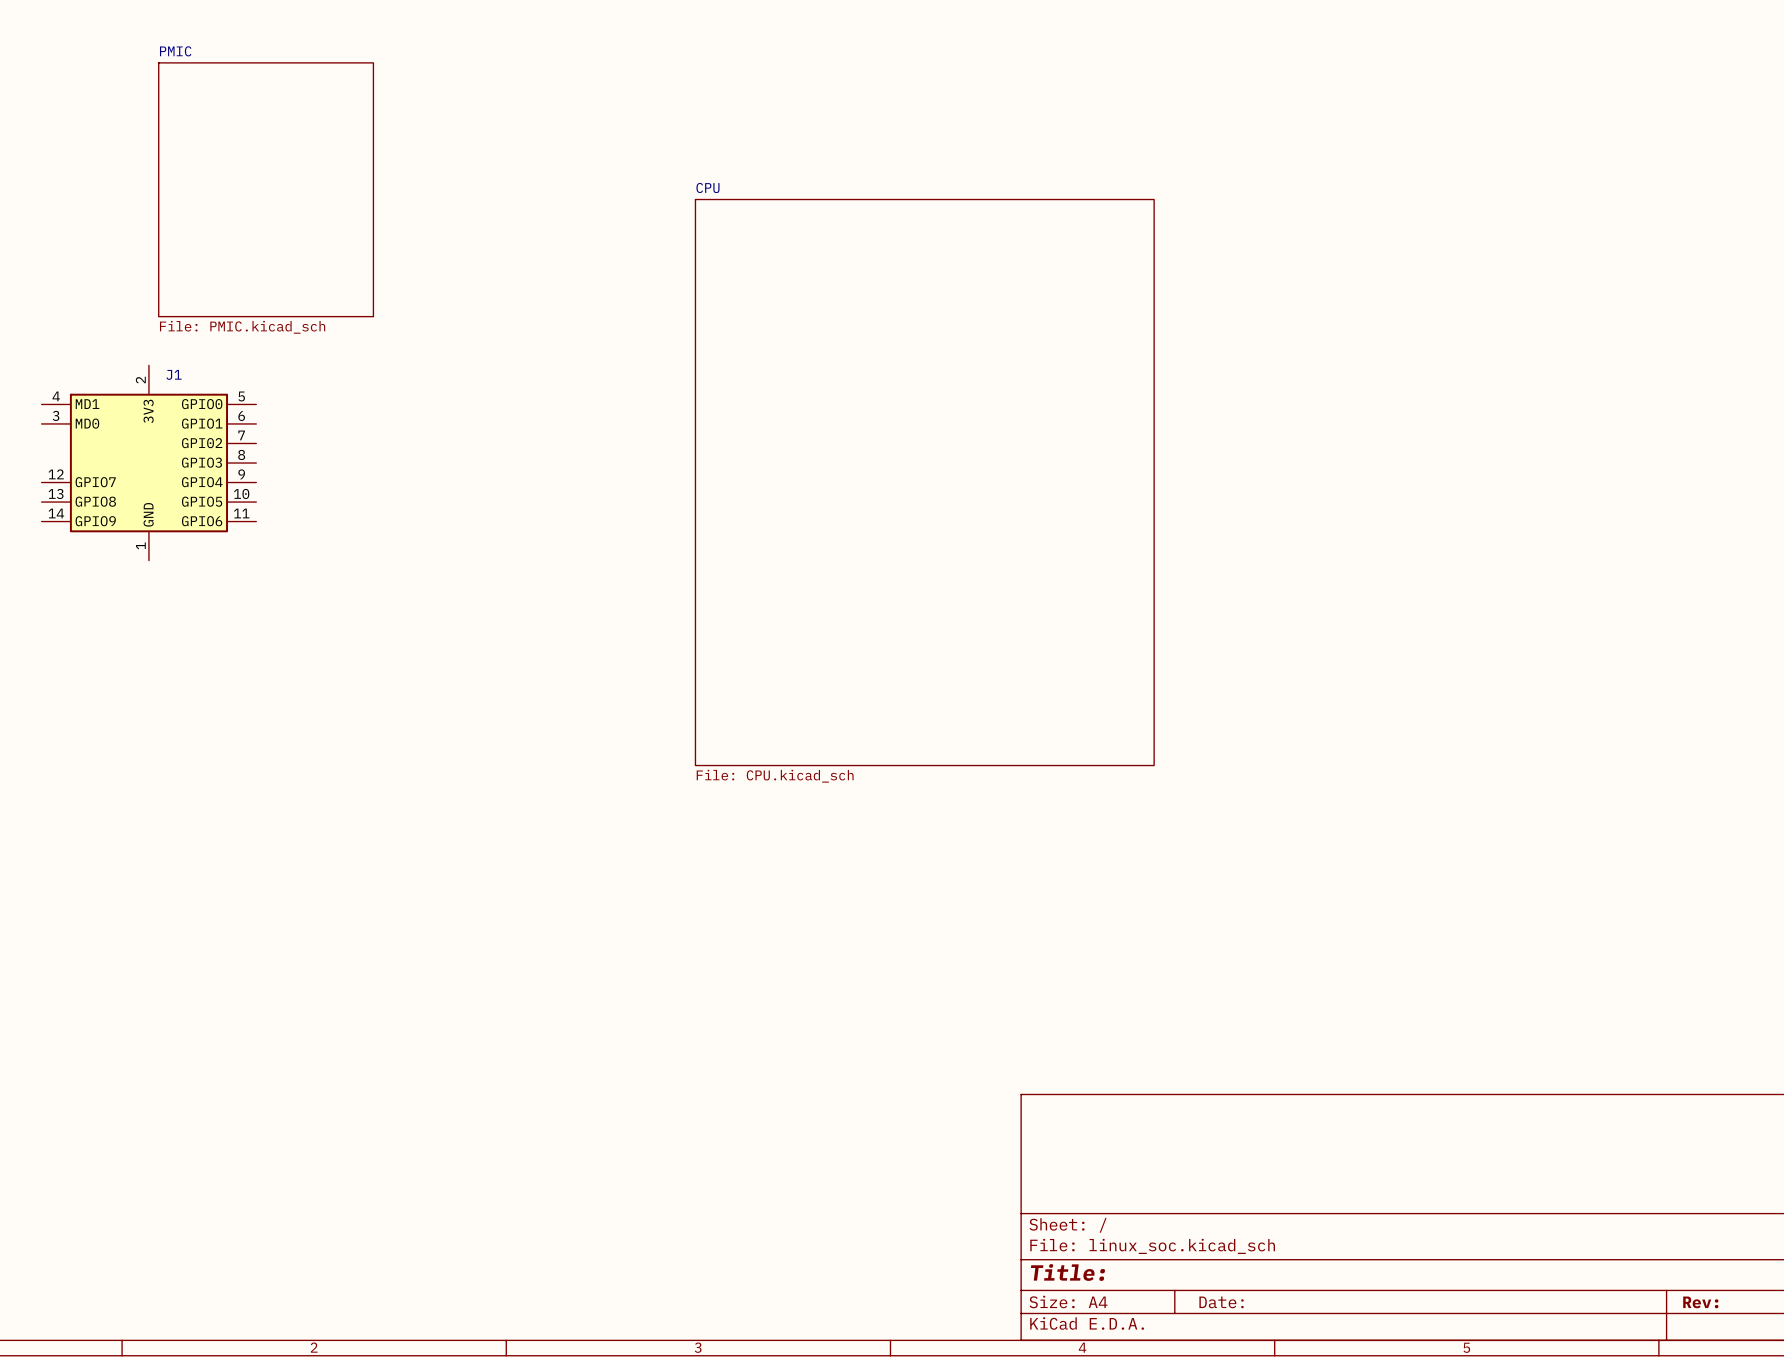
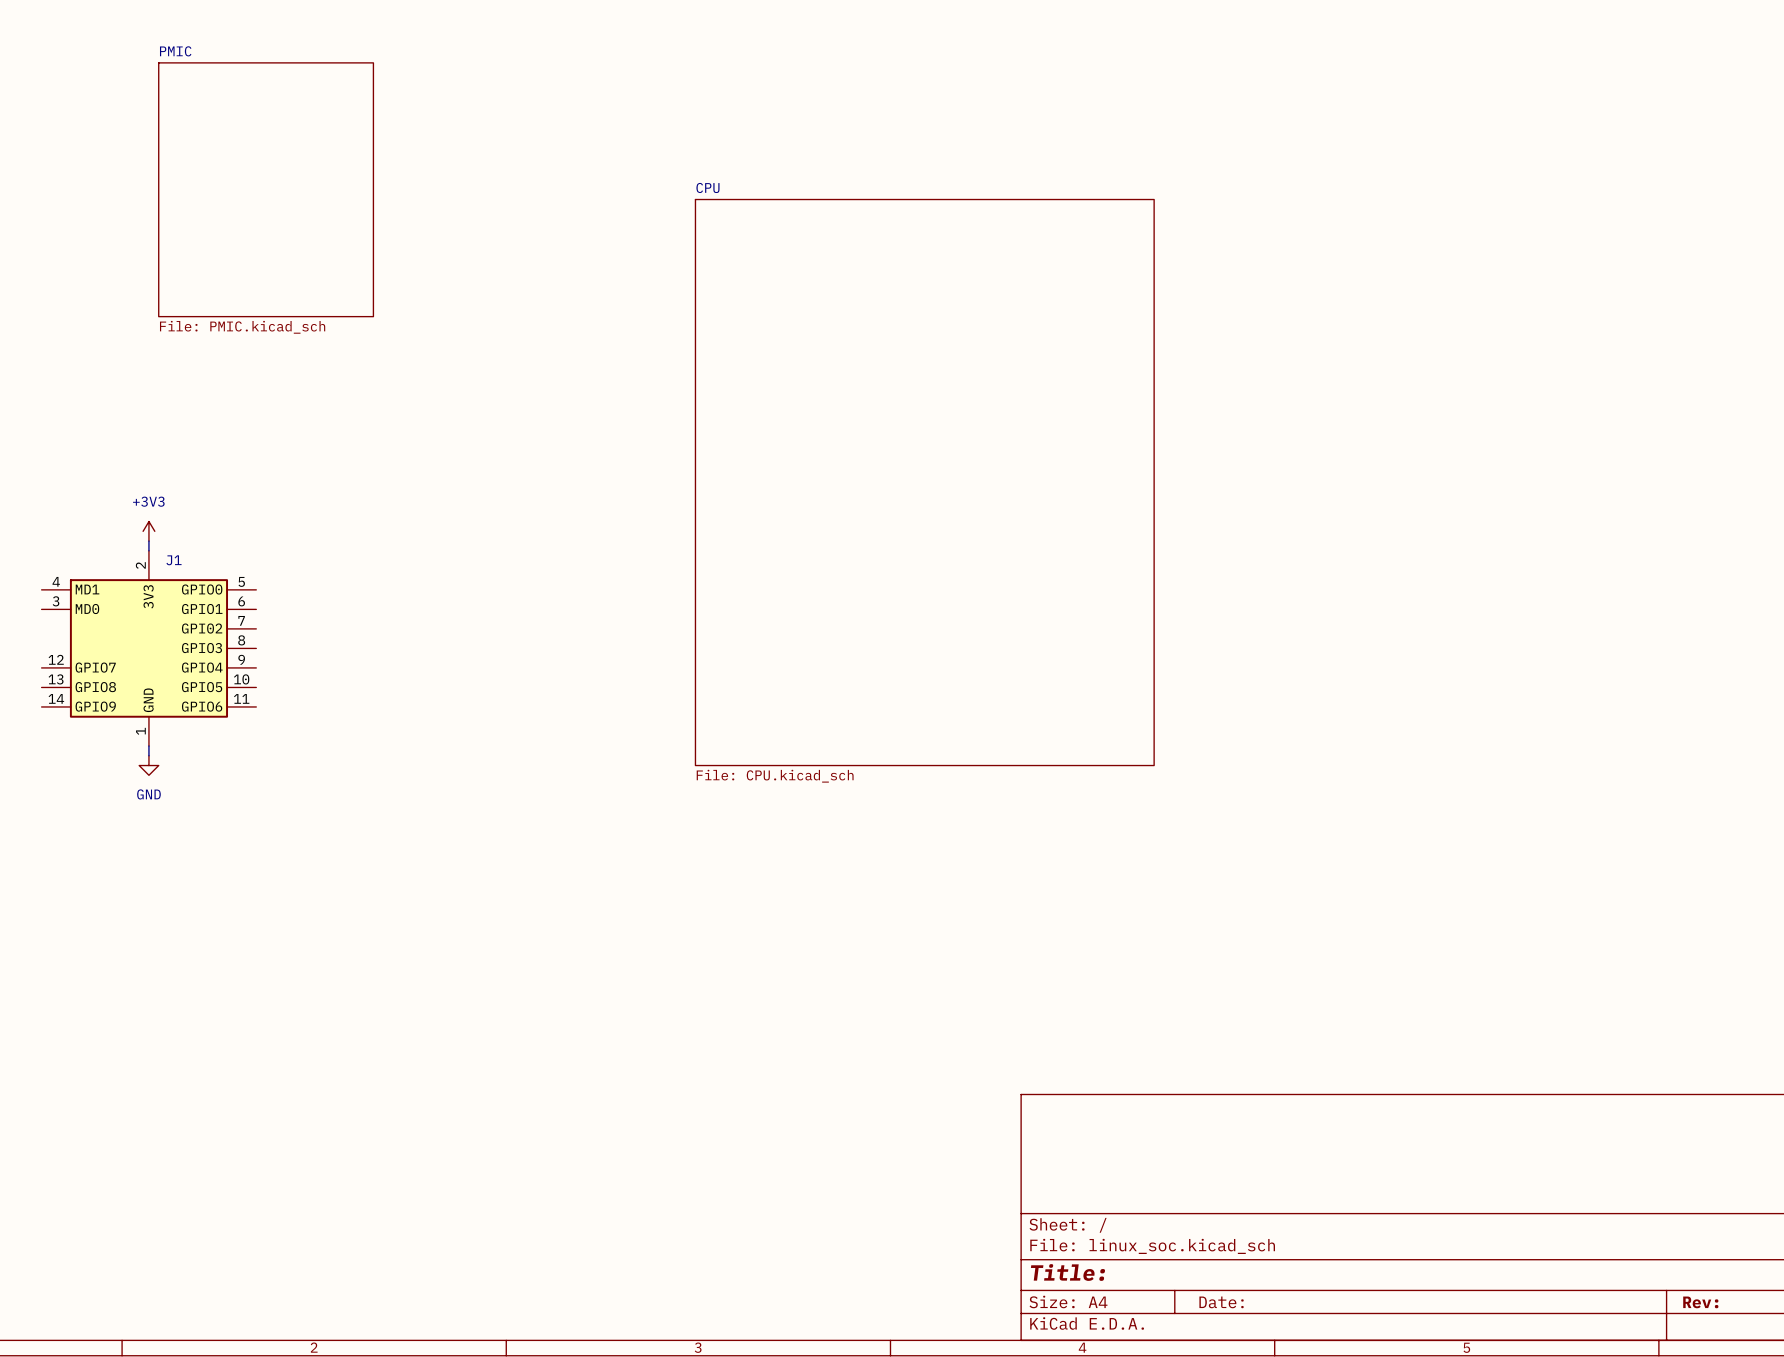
J1 position: (148, 463) -> (148, 648)
power symbol: none -> +3V3 (148, 531)
wire: none -> (148, 746) (148, 755)
power symbol: none -> GND (148, 765)

